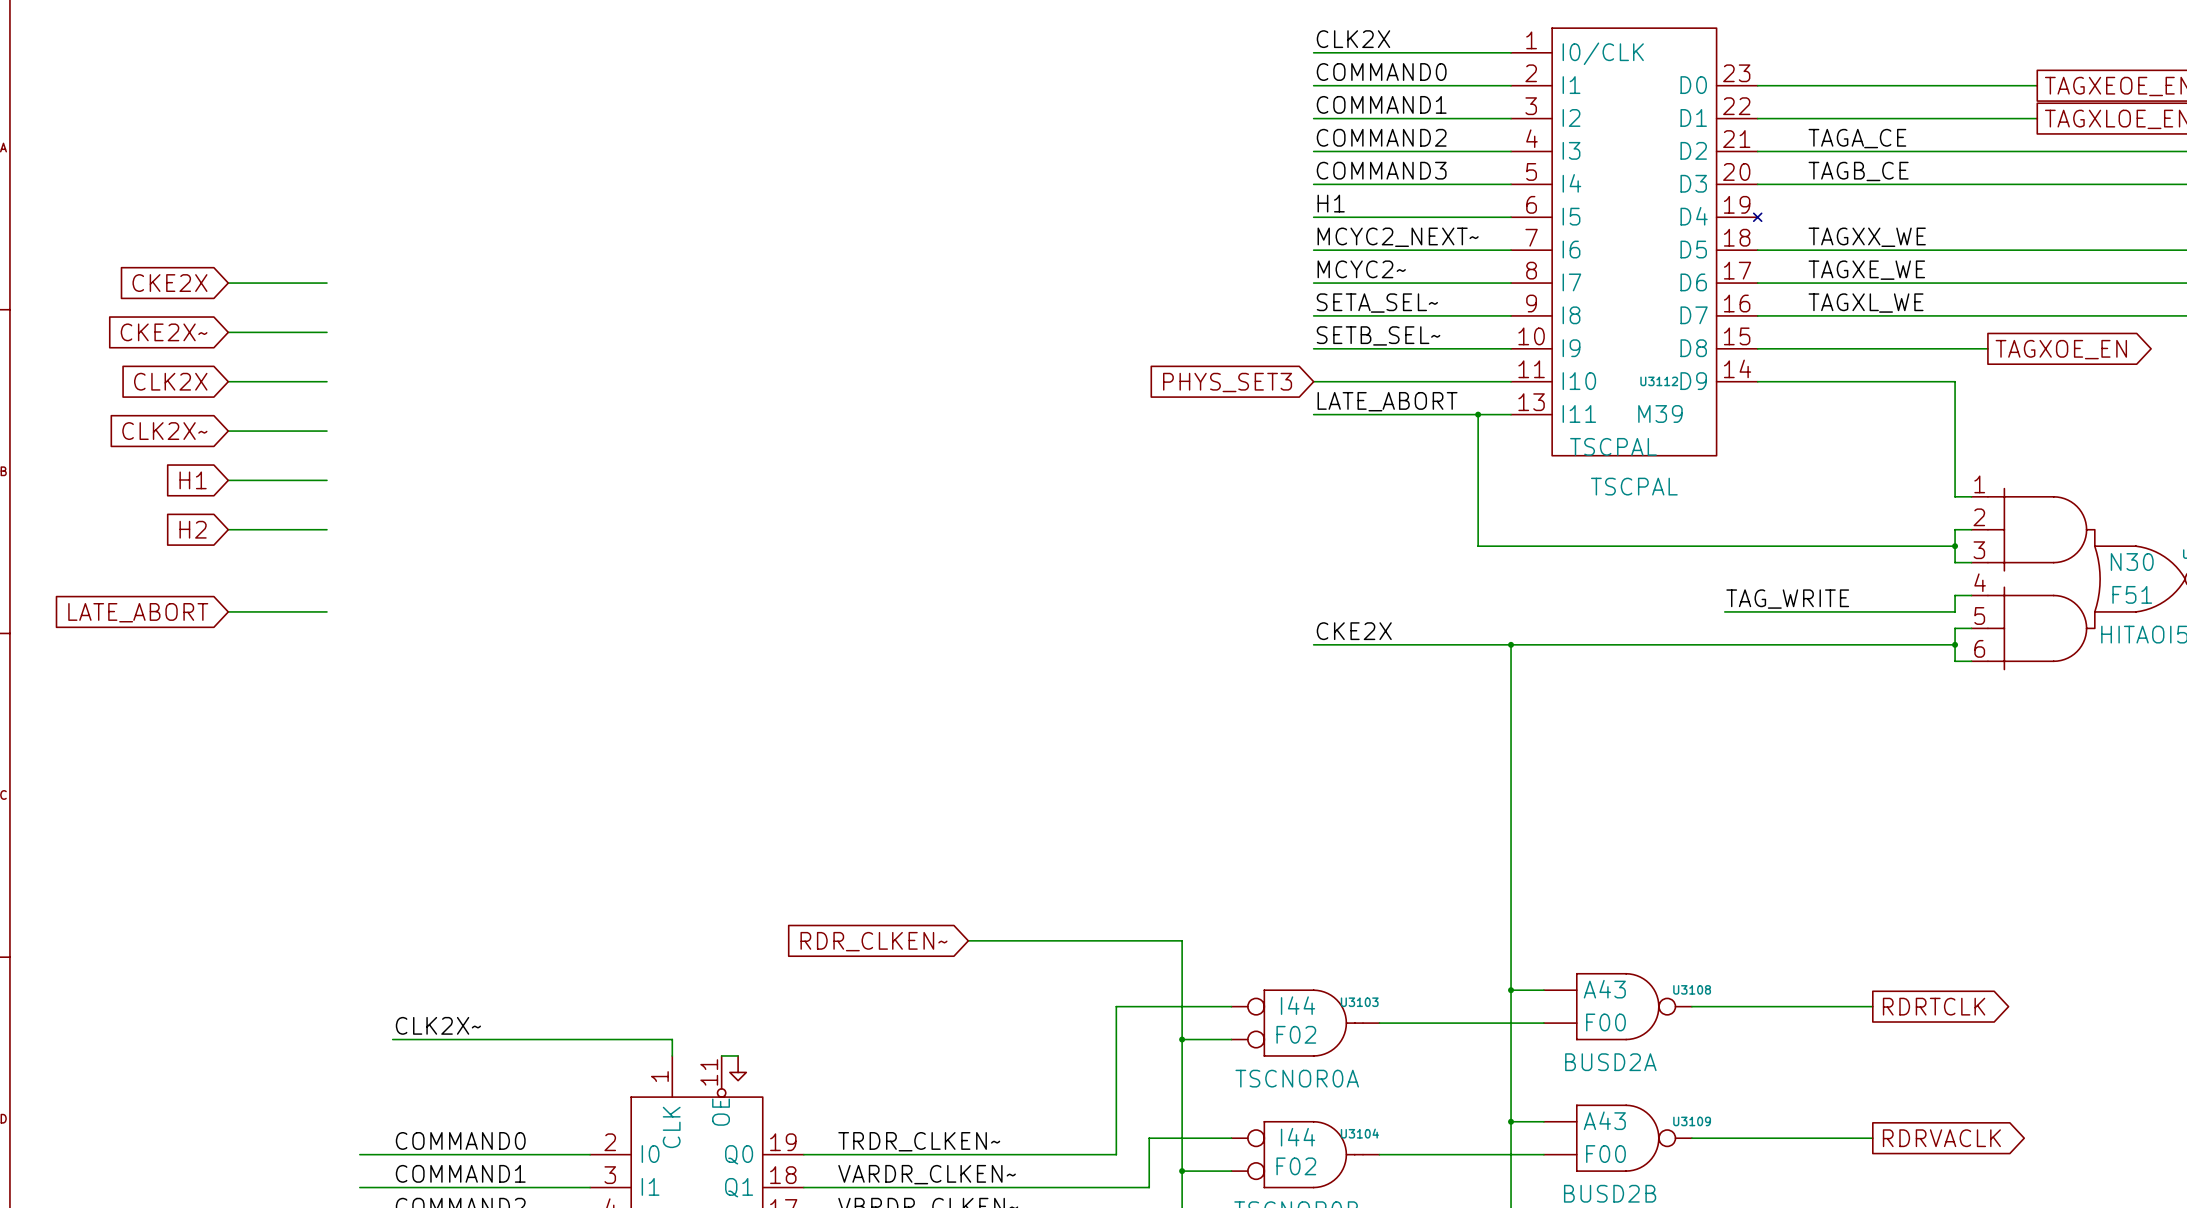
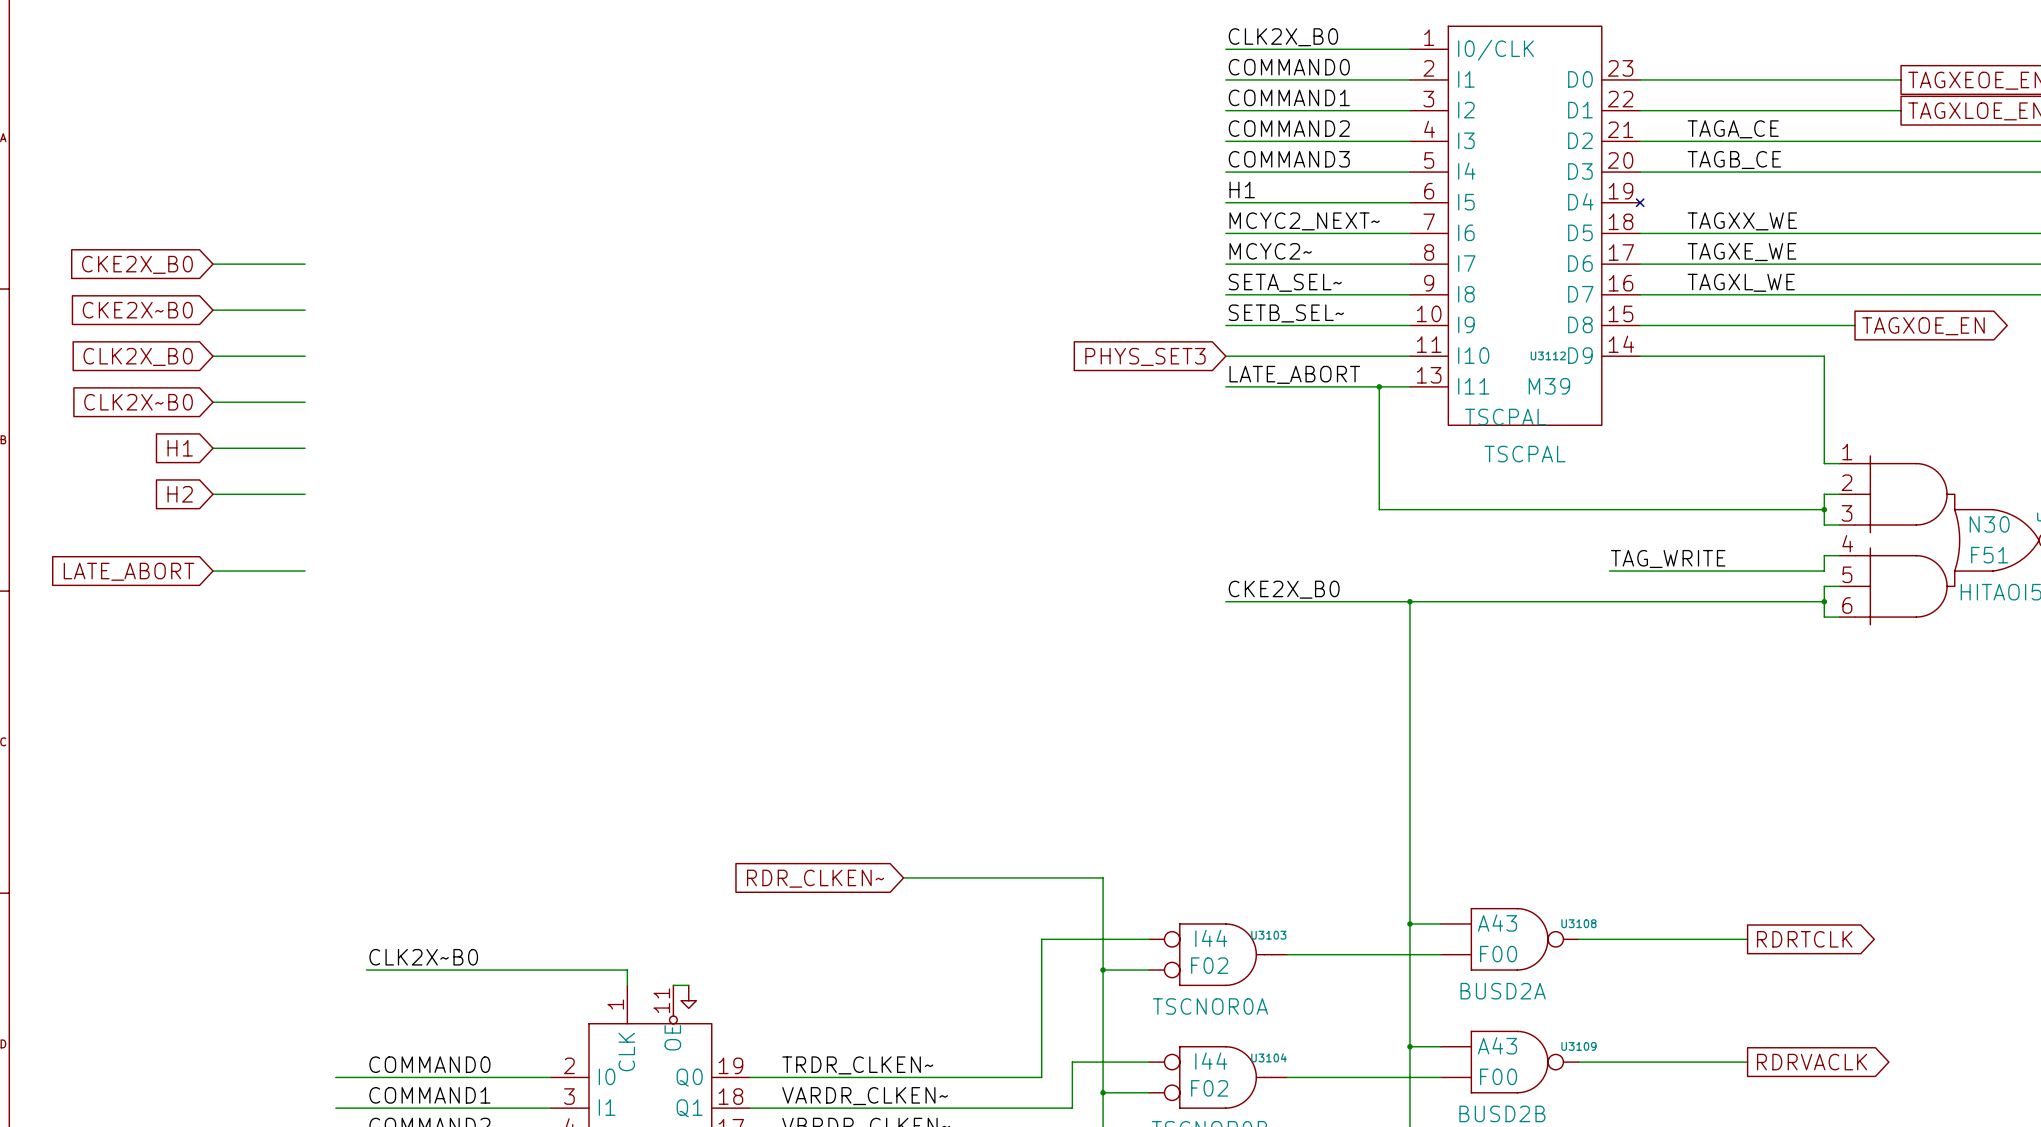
label: CLK2X (1353, 39) -> CLK2X_B0 (1283, 37)
global label: CKE2X (169, 283) -> CKE2X_B0 (137, 264)
global label: CKE2X~ (164, 332) -> CKE2X~B0 (137, 310)
global label: CLK2X (170, 381) -> CLK2X_B0 (138, 356)
global label: CLK2X~ (164, 431) -> CLK2X~B0 (138, 402)
label: CKE2X (1354, 631) -> CKE2X_B0 (1284, 589)
label: CLK2X~ (438, 1025) -> CLK2X~B0 (423, 957)

